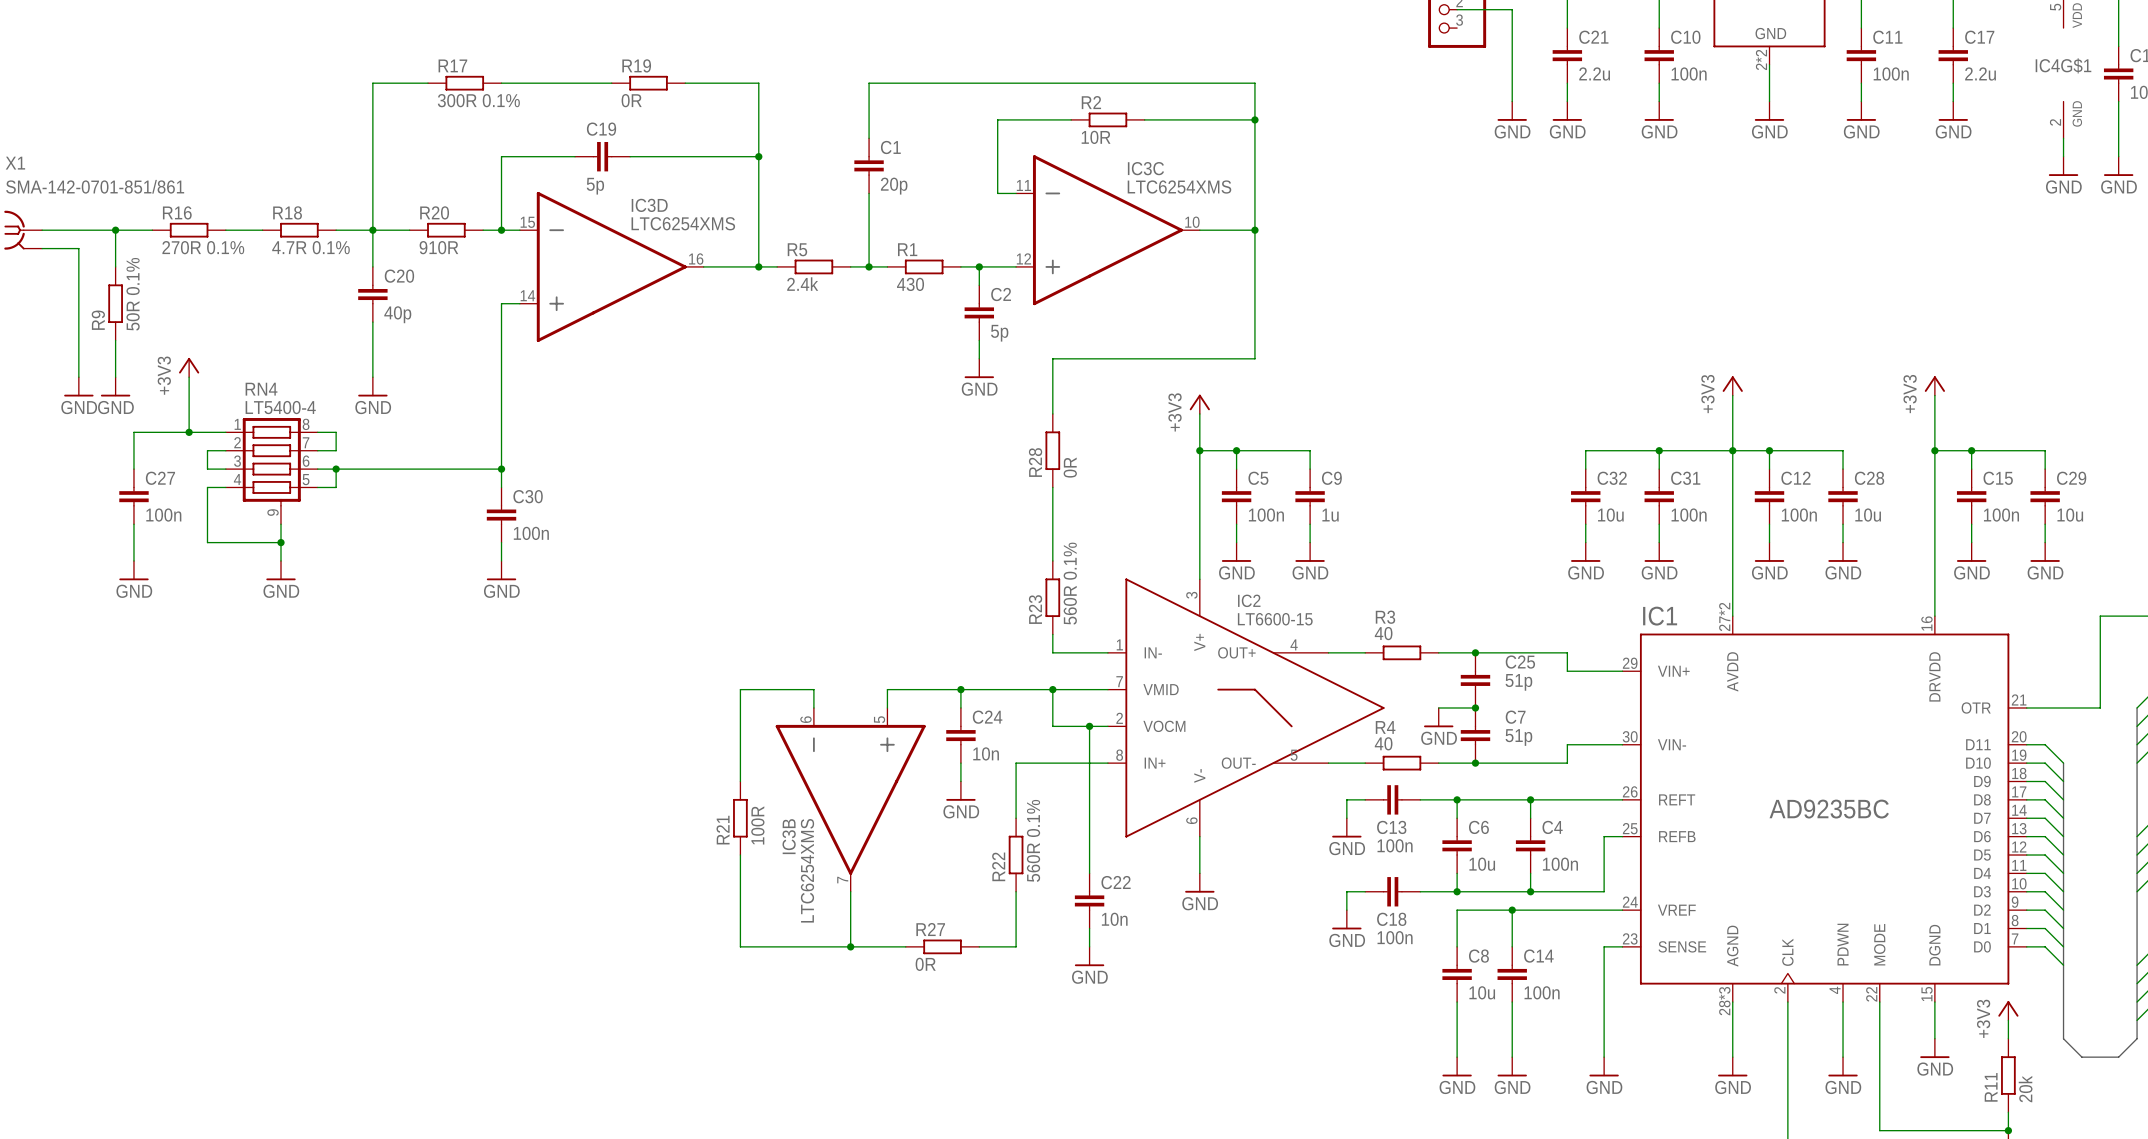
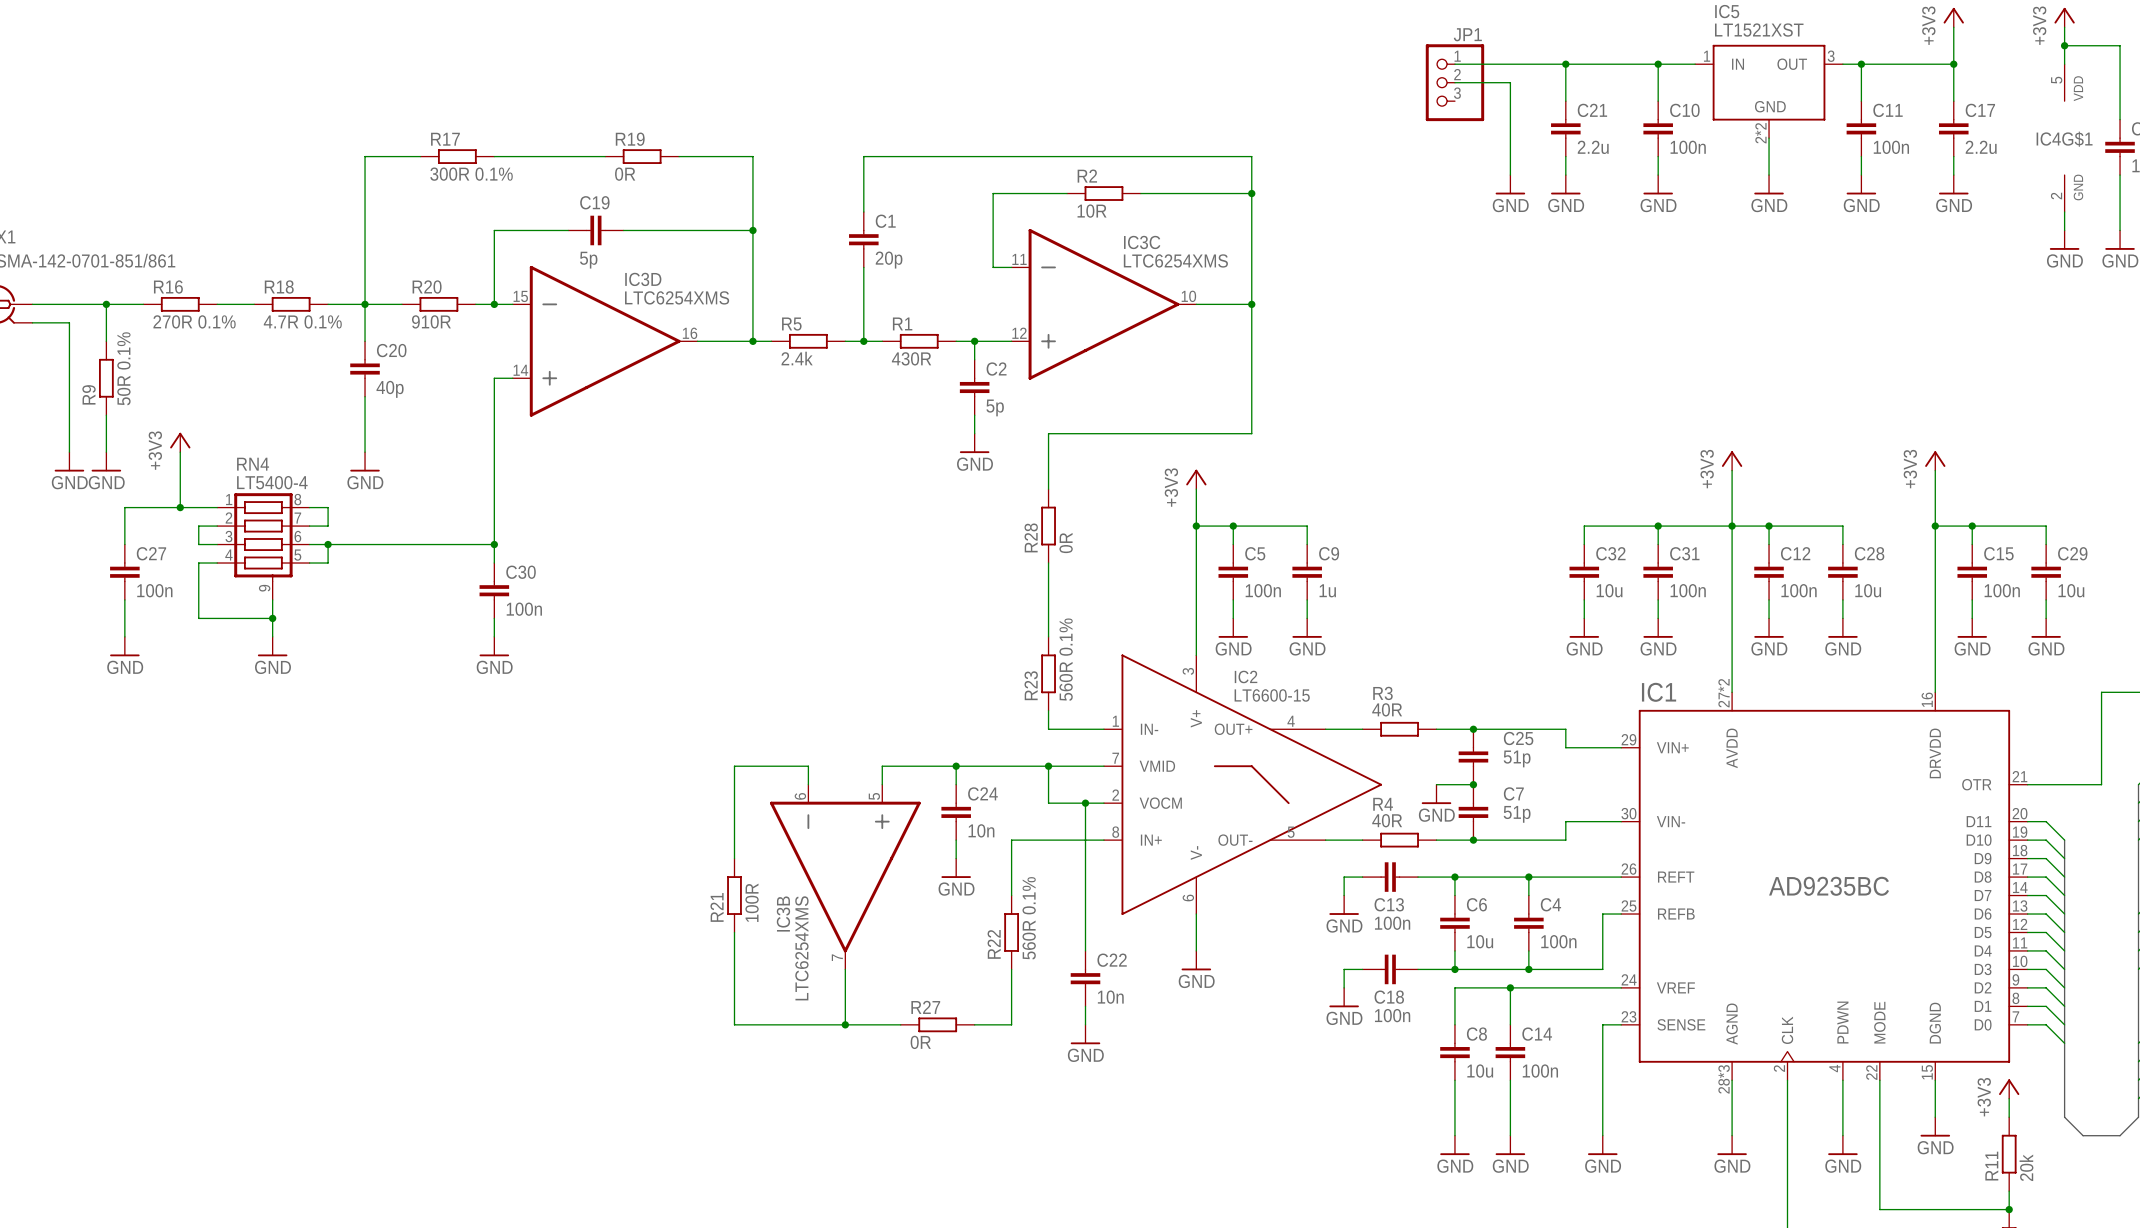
R1 value: 430 (910, 284) -> 430R (911, 358)
R3 value: 40 (1383, 633) -> 40R (1387, 709)
R4 value: 40 (1383, 743) -> 40R (1387, 820)

